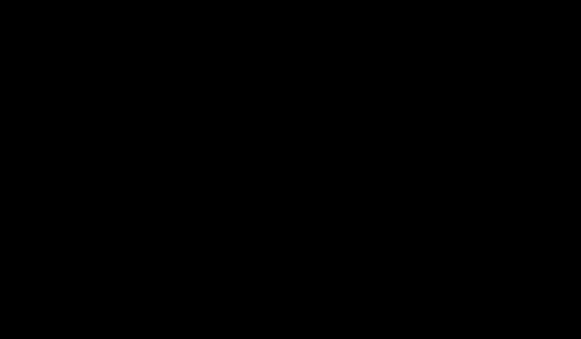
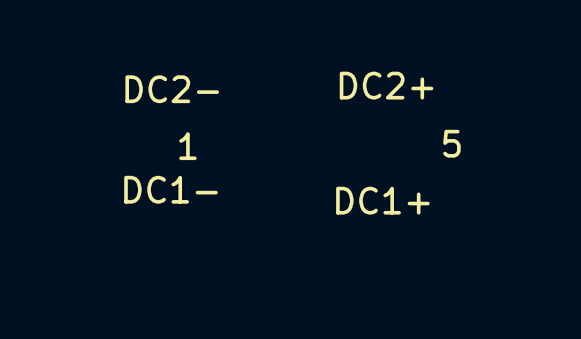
text: none -> DC2+ (386, 85)
text: none -> DC2- (172, 89)
text: none -> 5 (451, 143)
text: none -> 1 (187, 146)
text: none -> DC1- (170, 189)
text: none -> DC1+ (382, 200)

